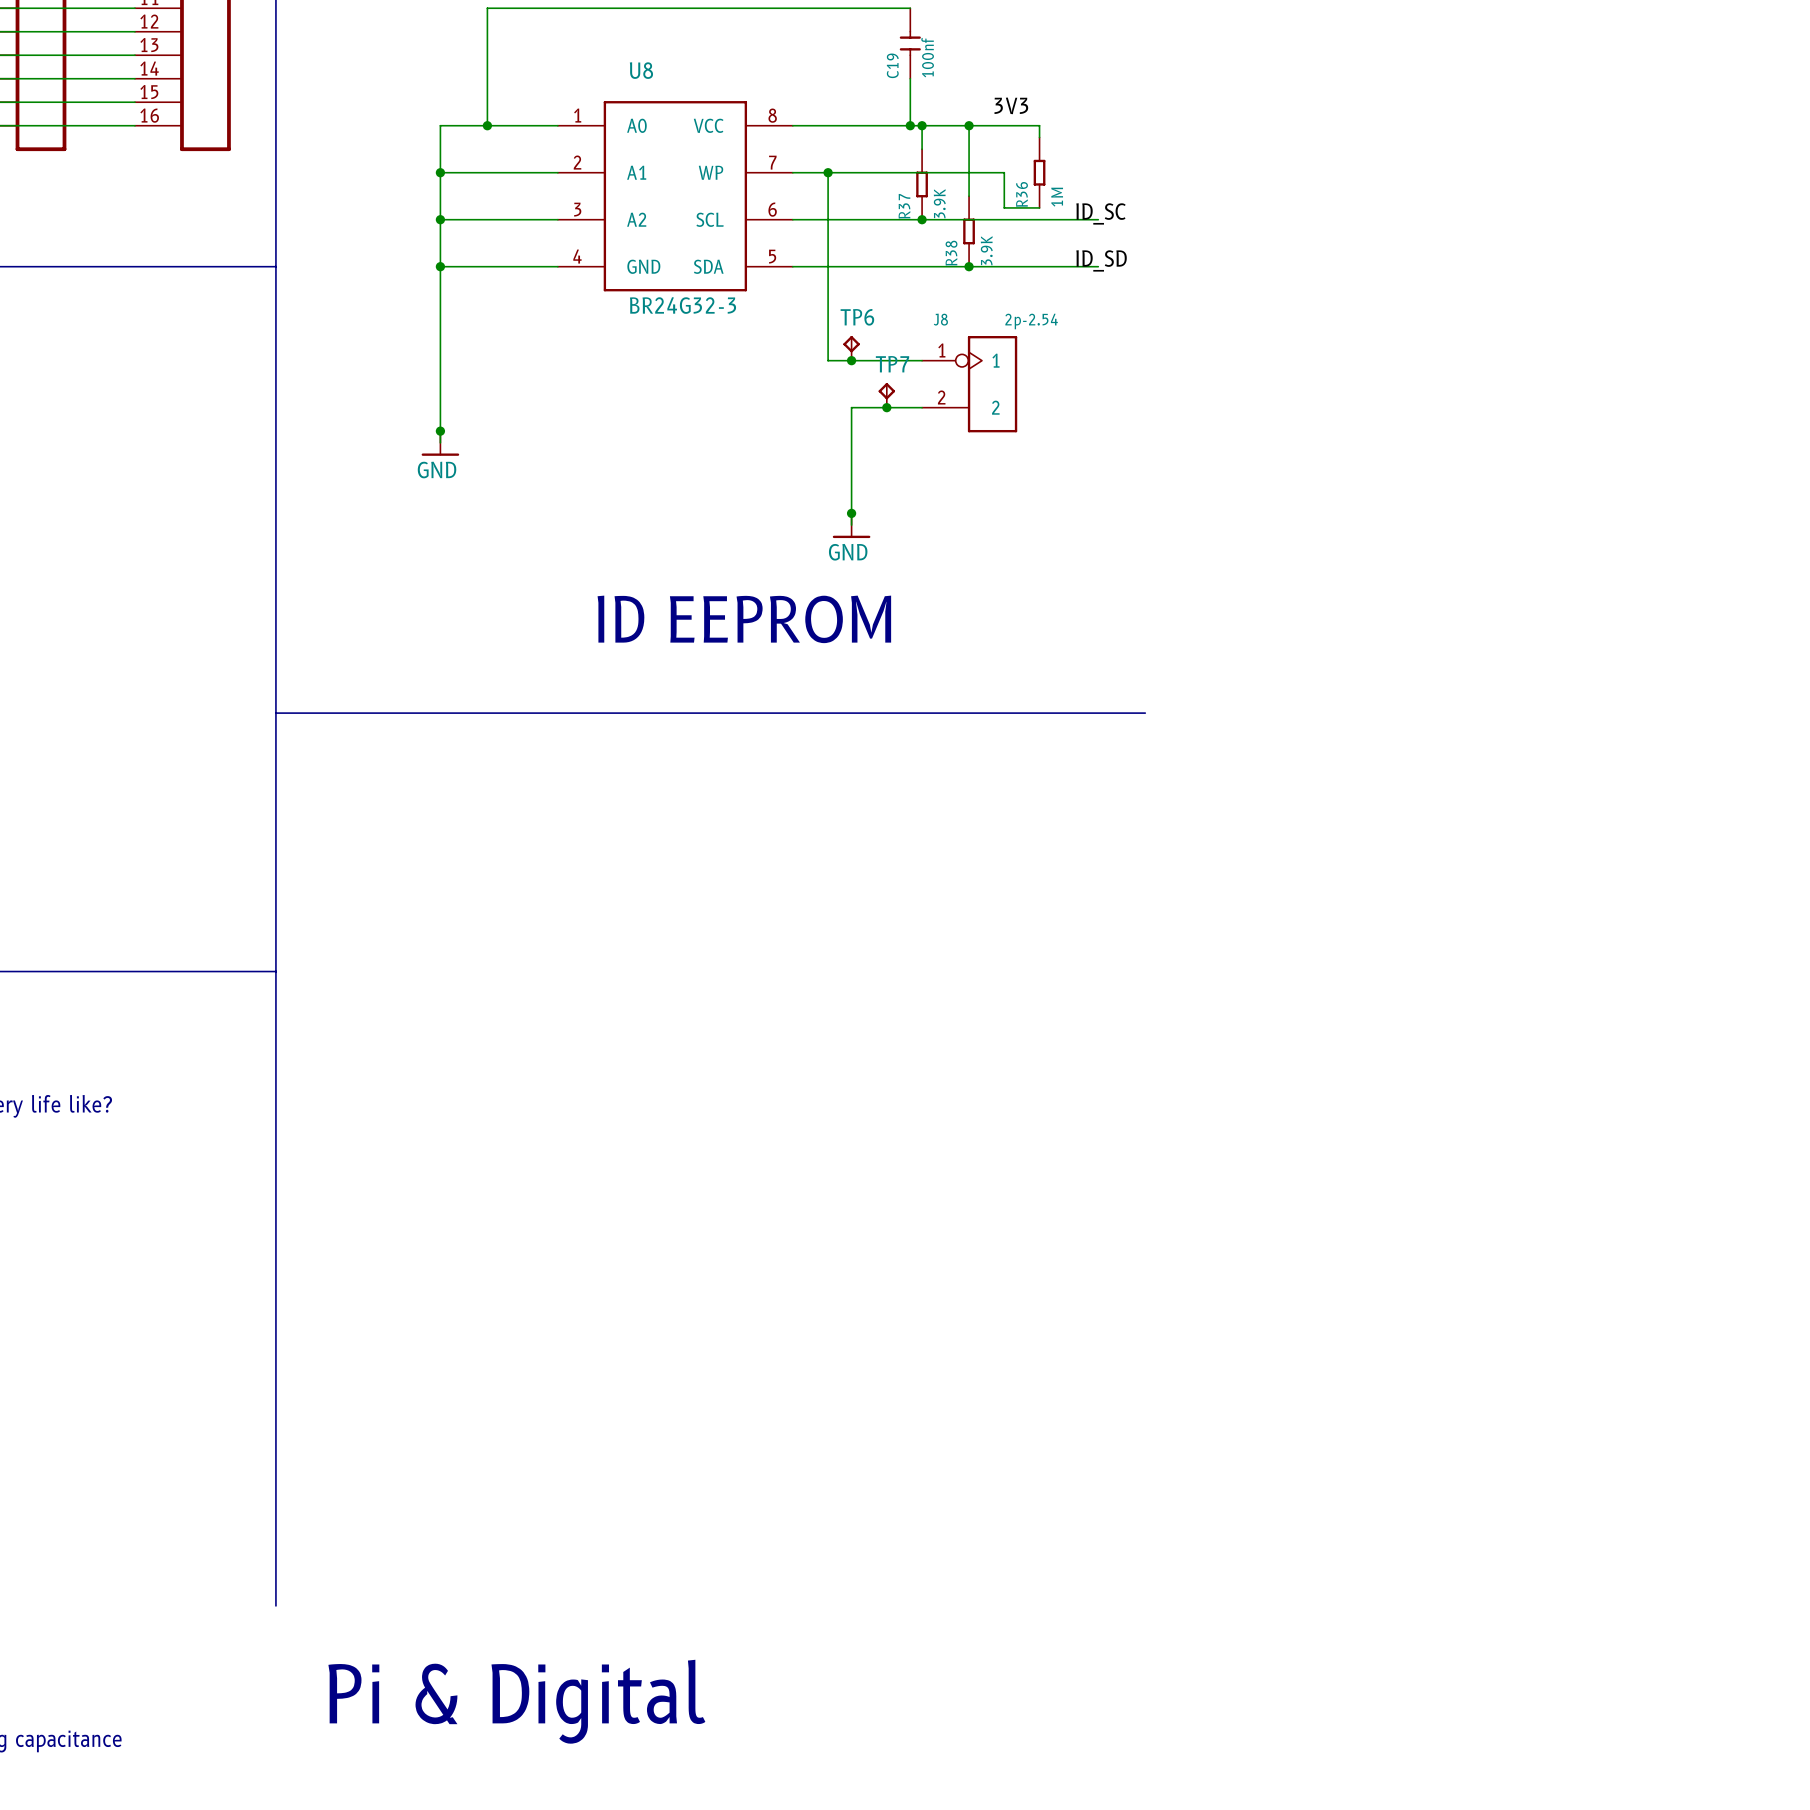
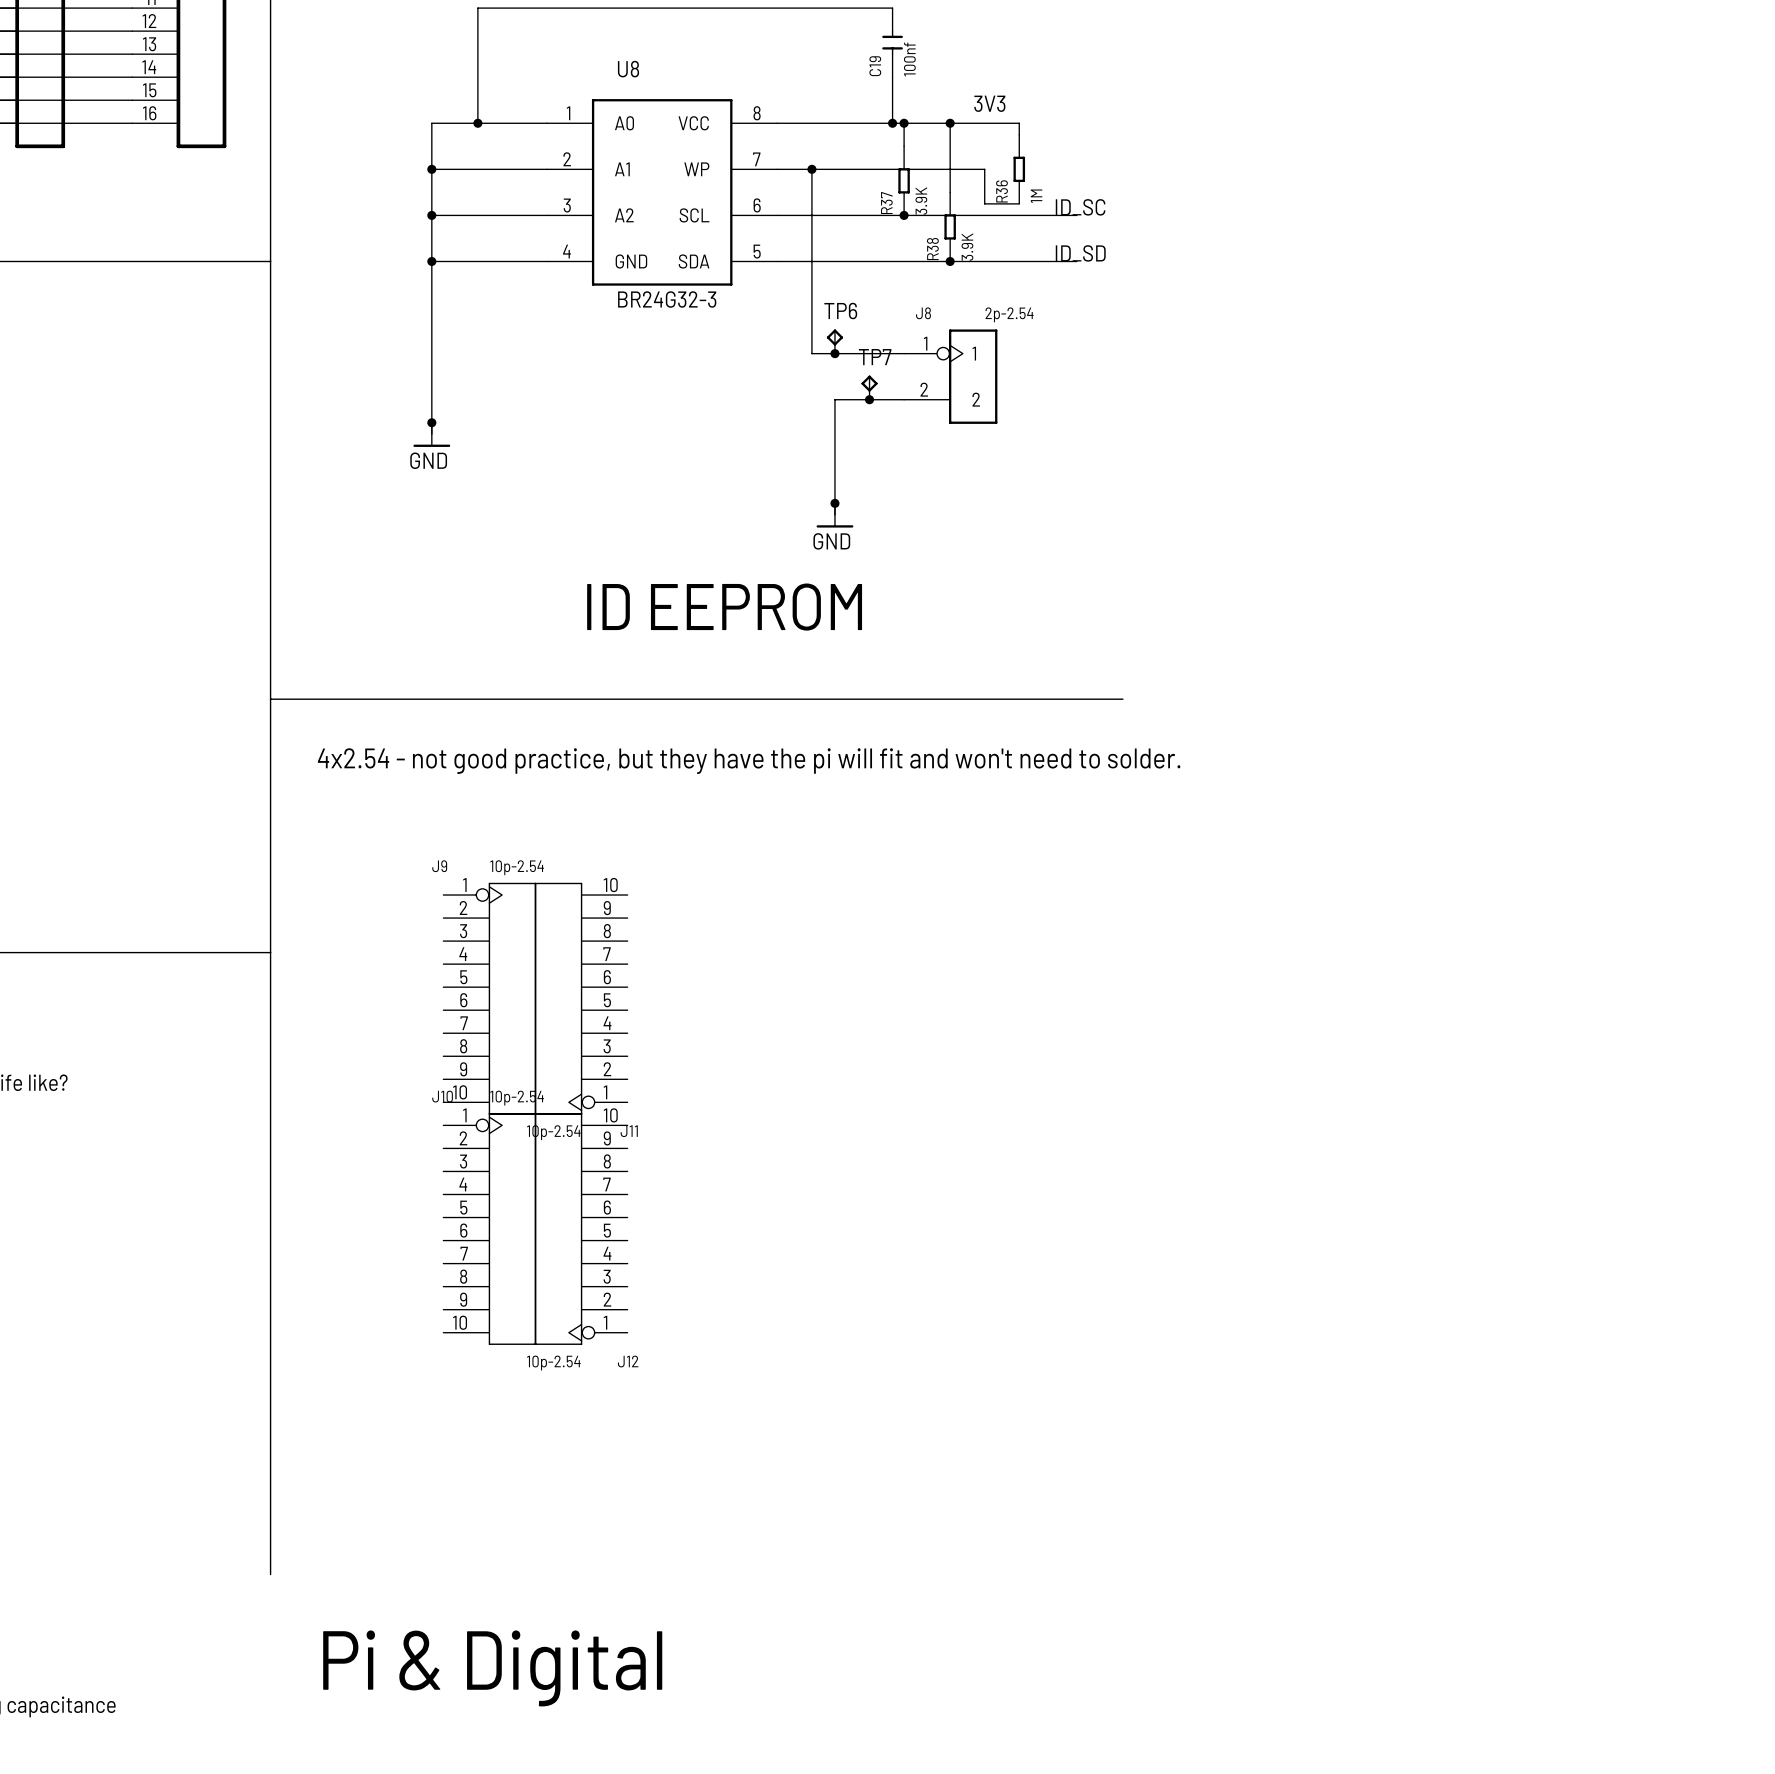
text: none -> 4x2.54 - not good practice, but they have the pi will fit and won't need to solder. (749, 761)
J9: none -> 10p-2.54 (489, 998)
J11: none -> 10p-2.54 (581, 998)
J10: none -> 10p-2.54 (489, 1229)
J12: none -> 10p-2.54 (581, 1229)

